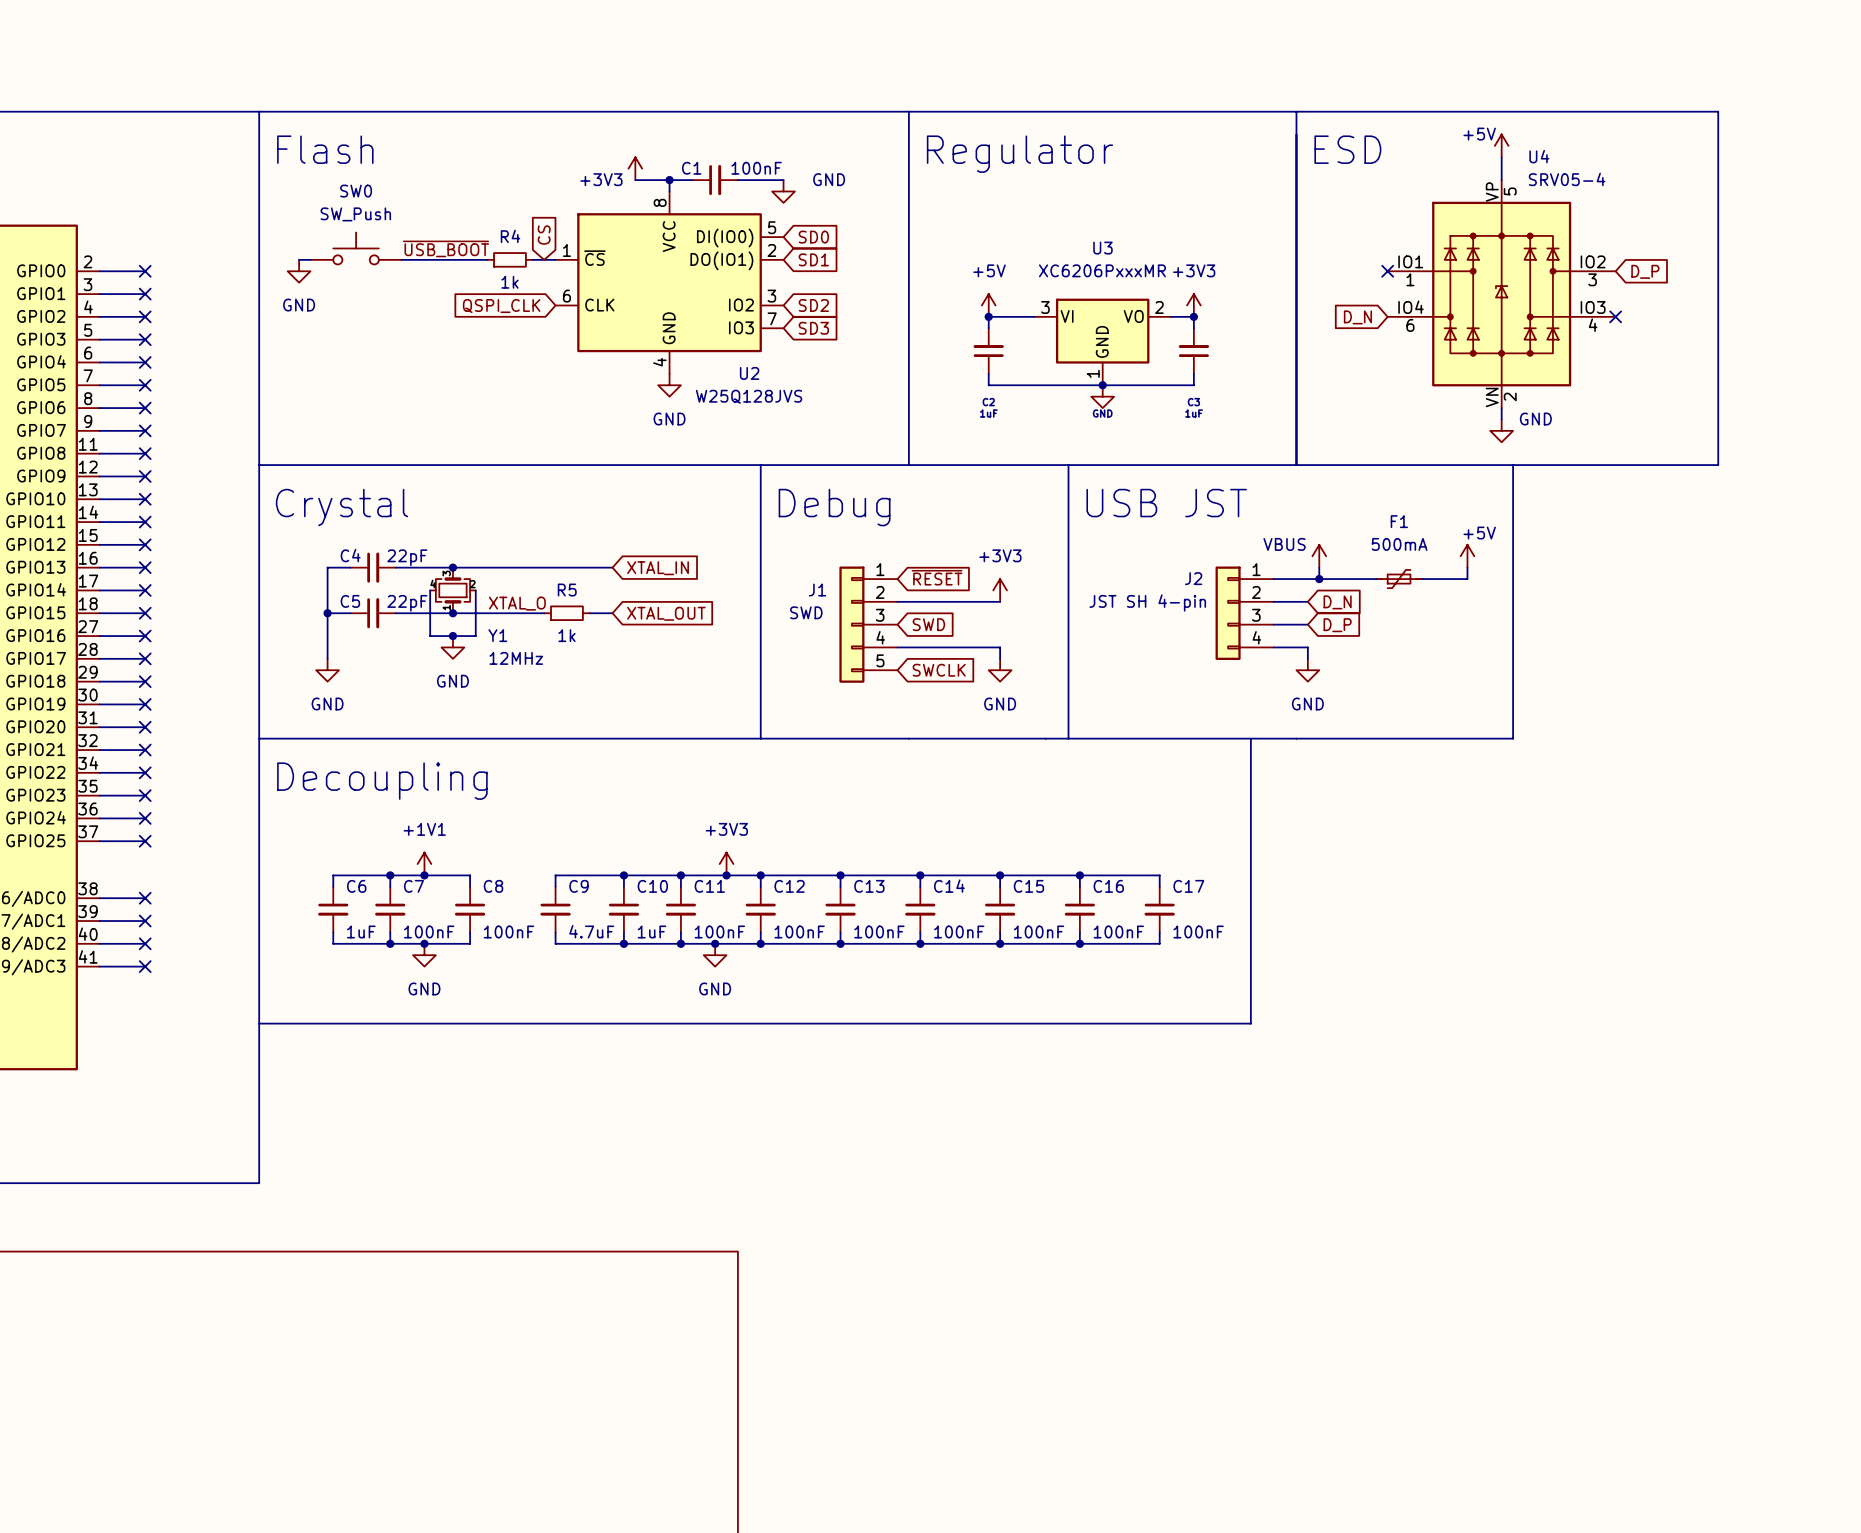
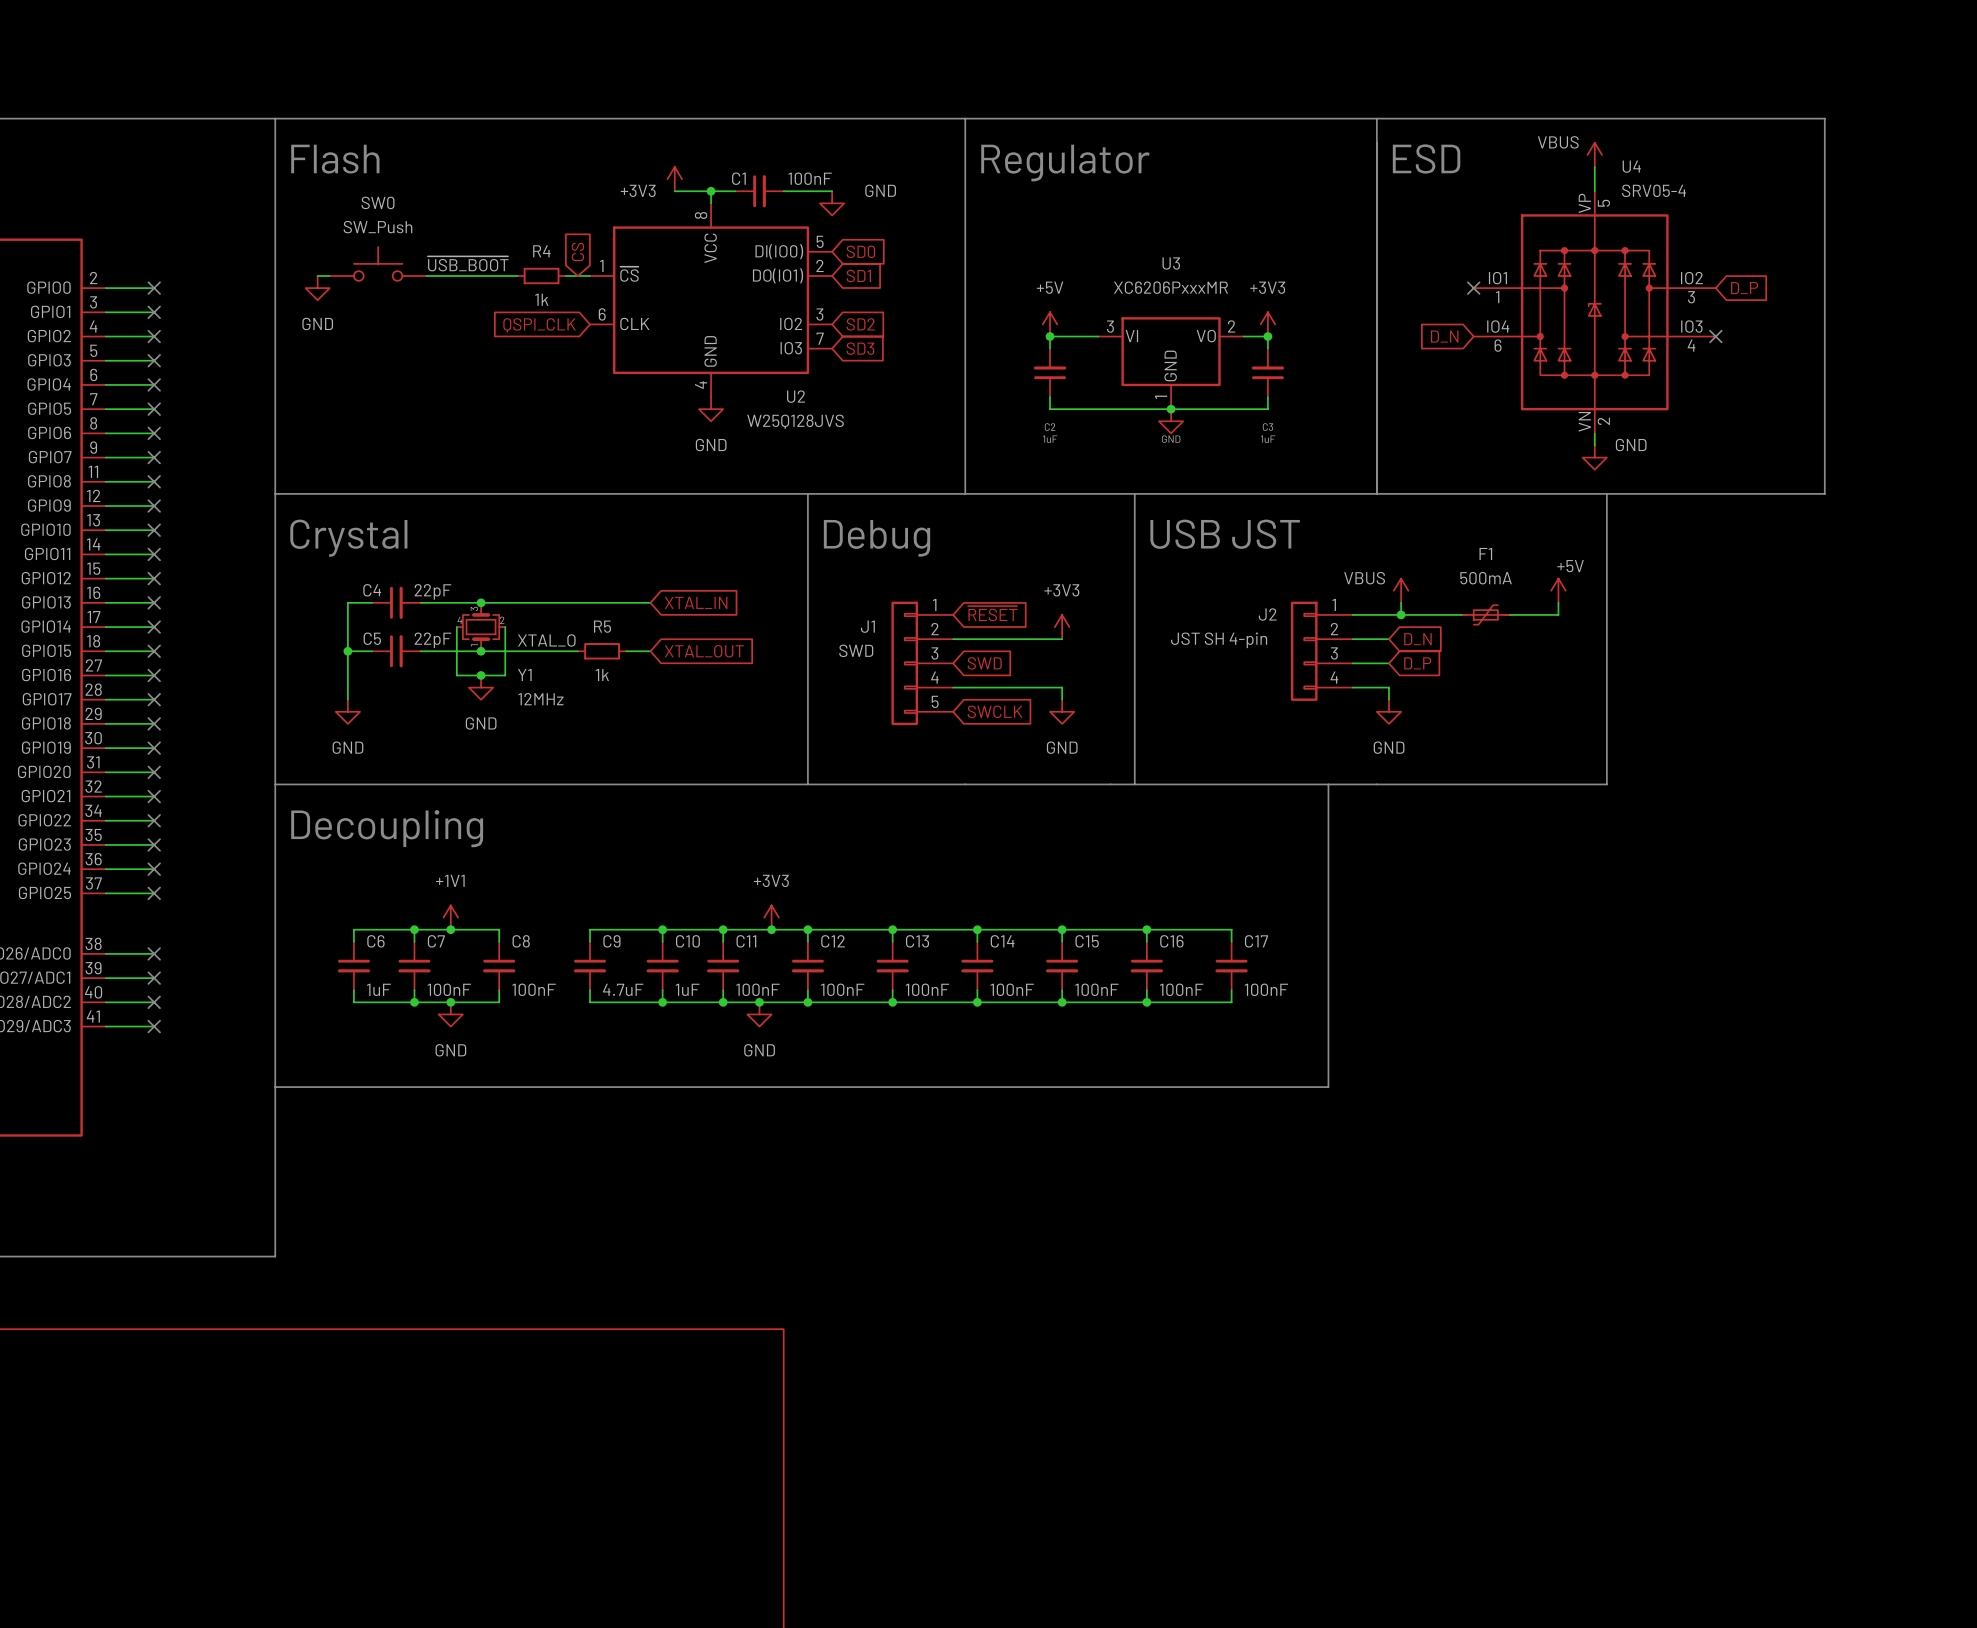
power symbol: +5V (1501, 145) -> VBUS (1594, 154)

